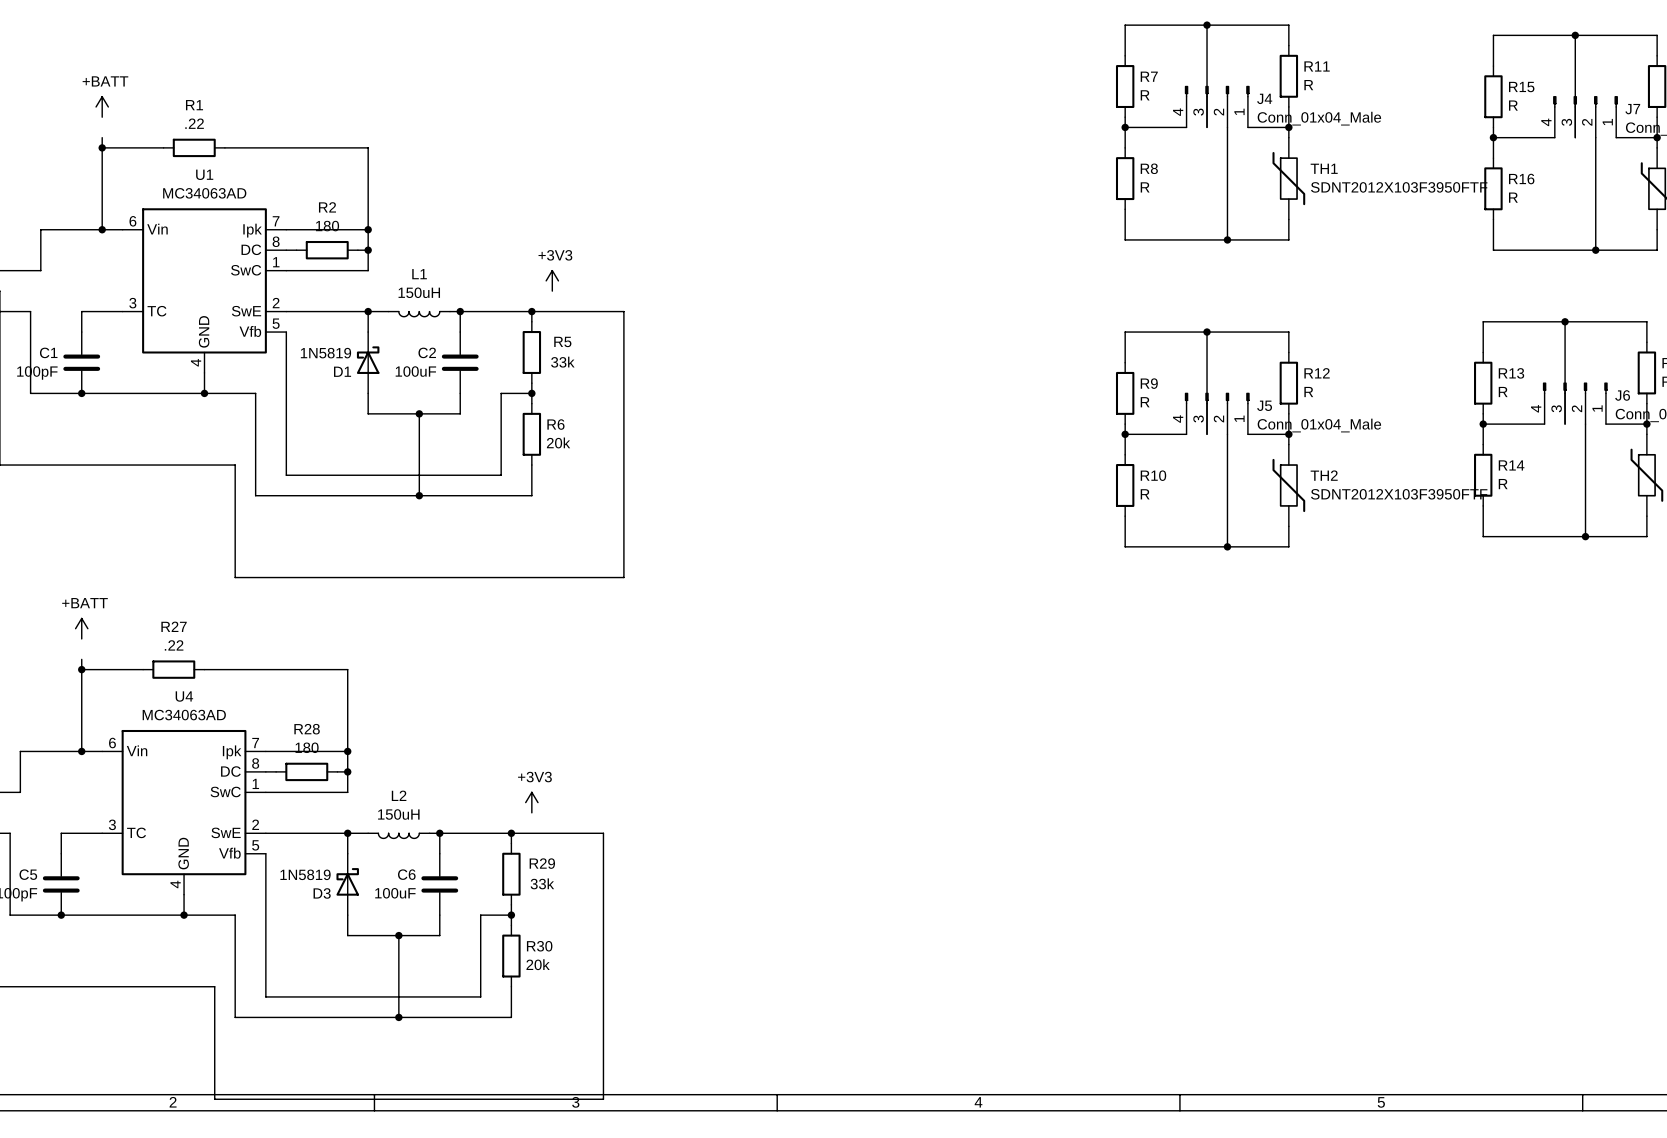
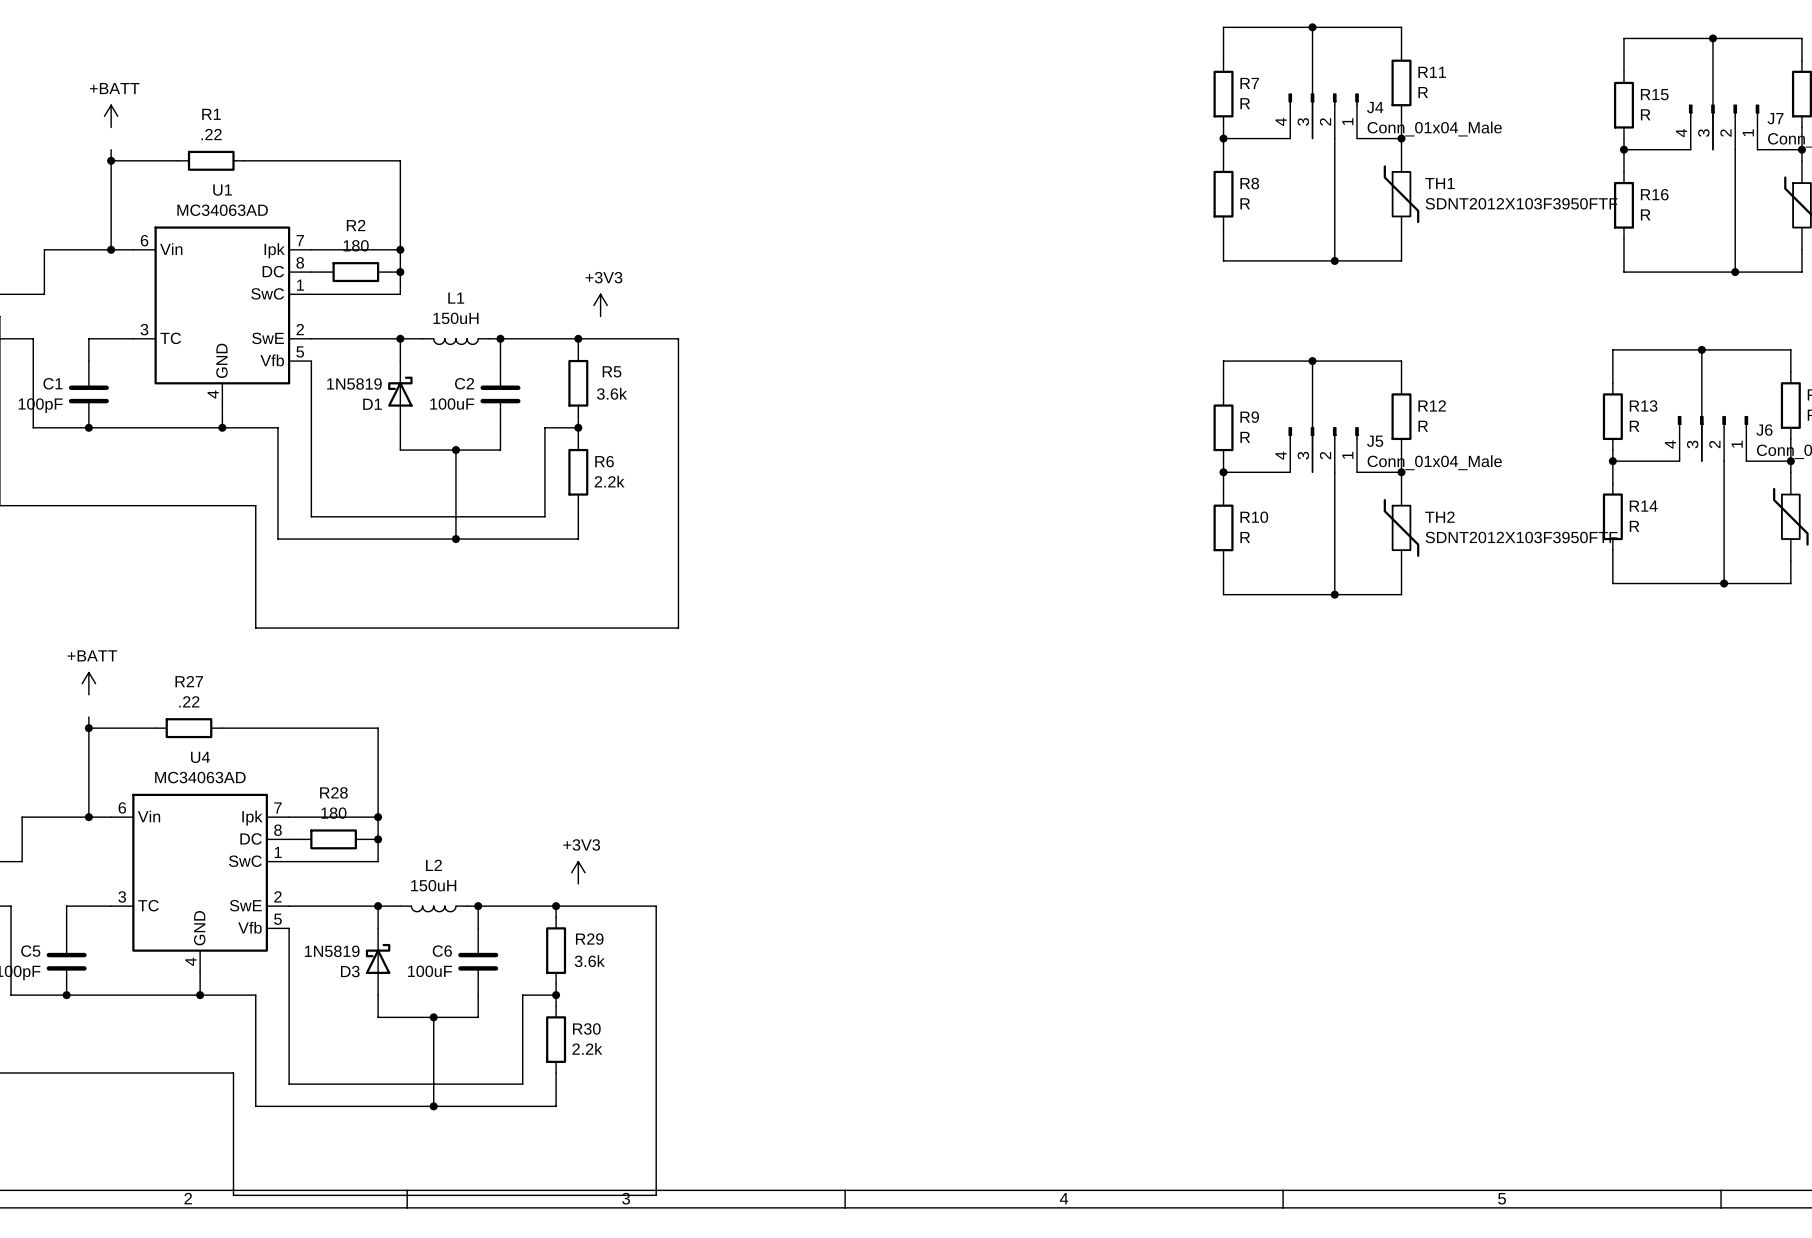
R5 value: 33k (562, 362) -> 3.6k (612, 393)
R6 value: 20k (558, 442) -> 2.2k (609, 481)
R29 value: 33k (542, 883) -> 3.6k (589, 961)
R30 value: 20k (538, 964) -> 2.2k (587, 1048)

